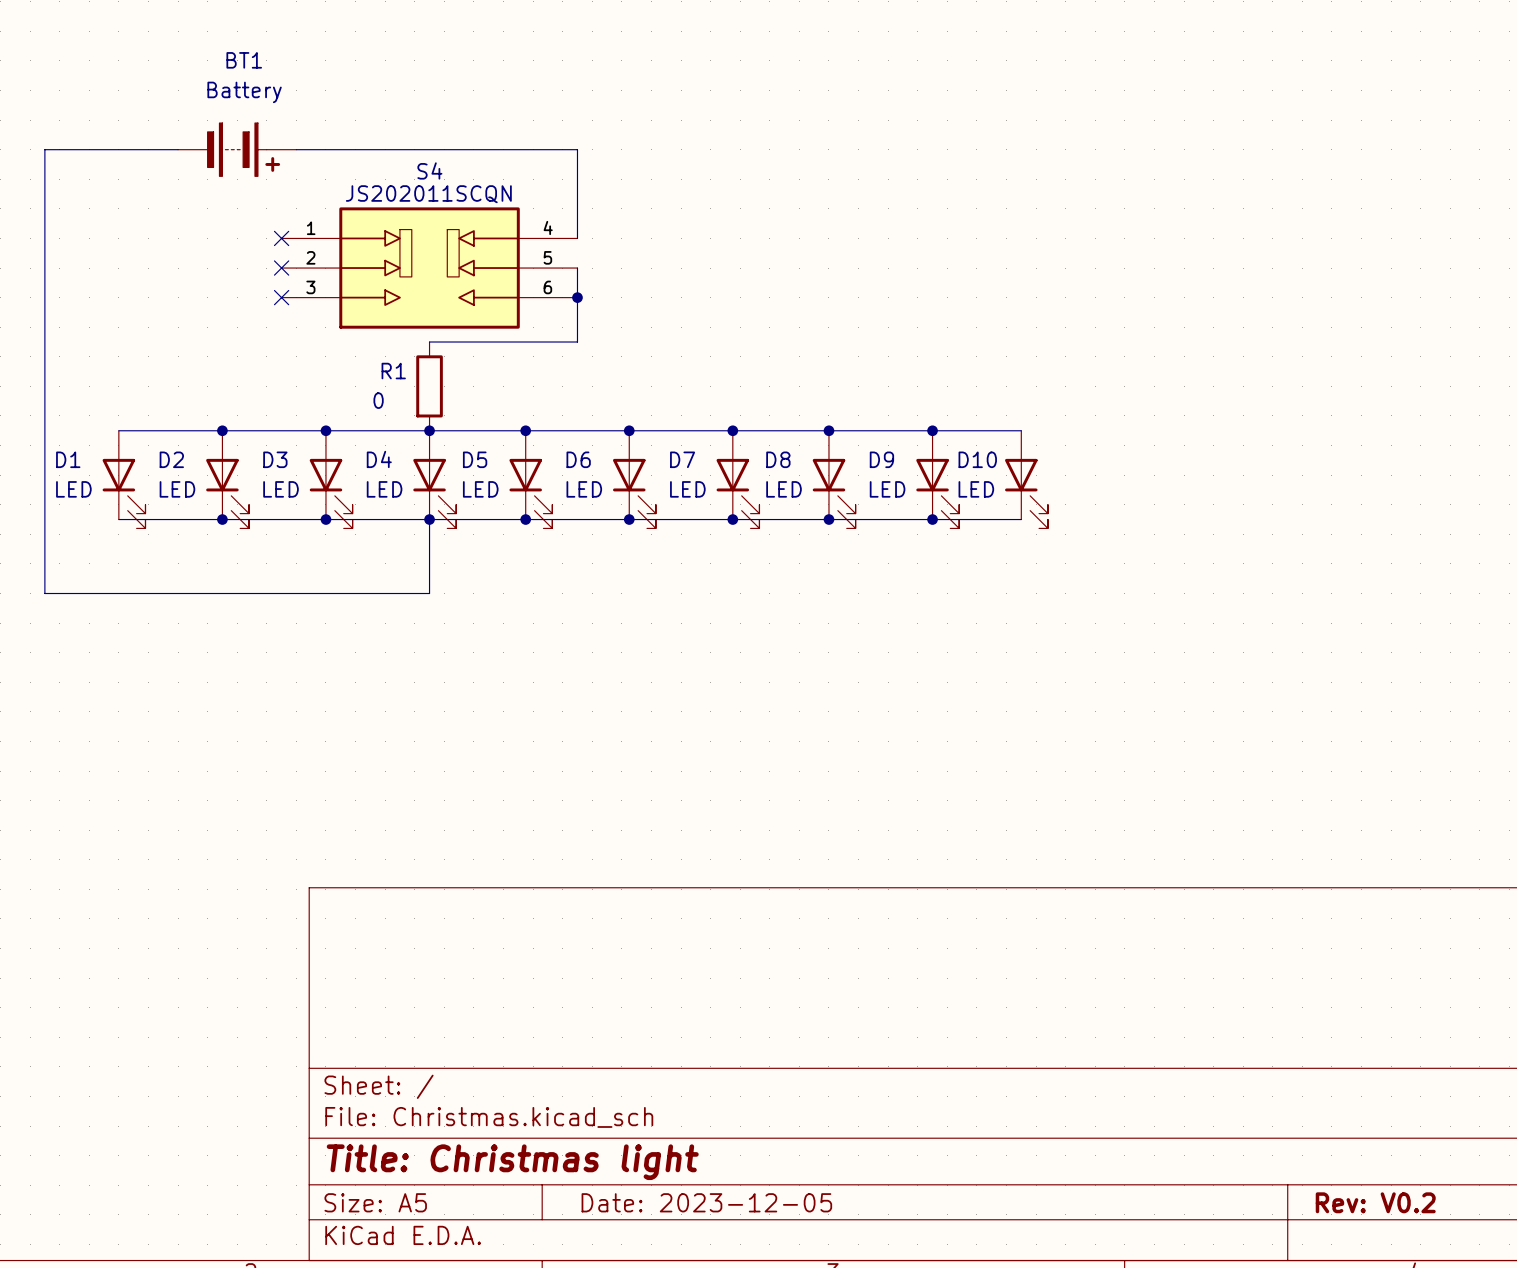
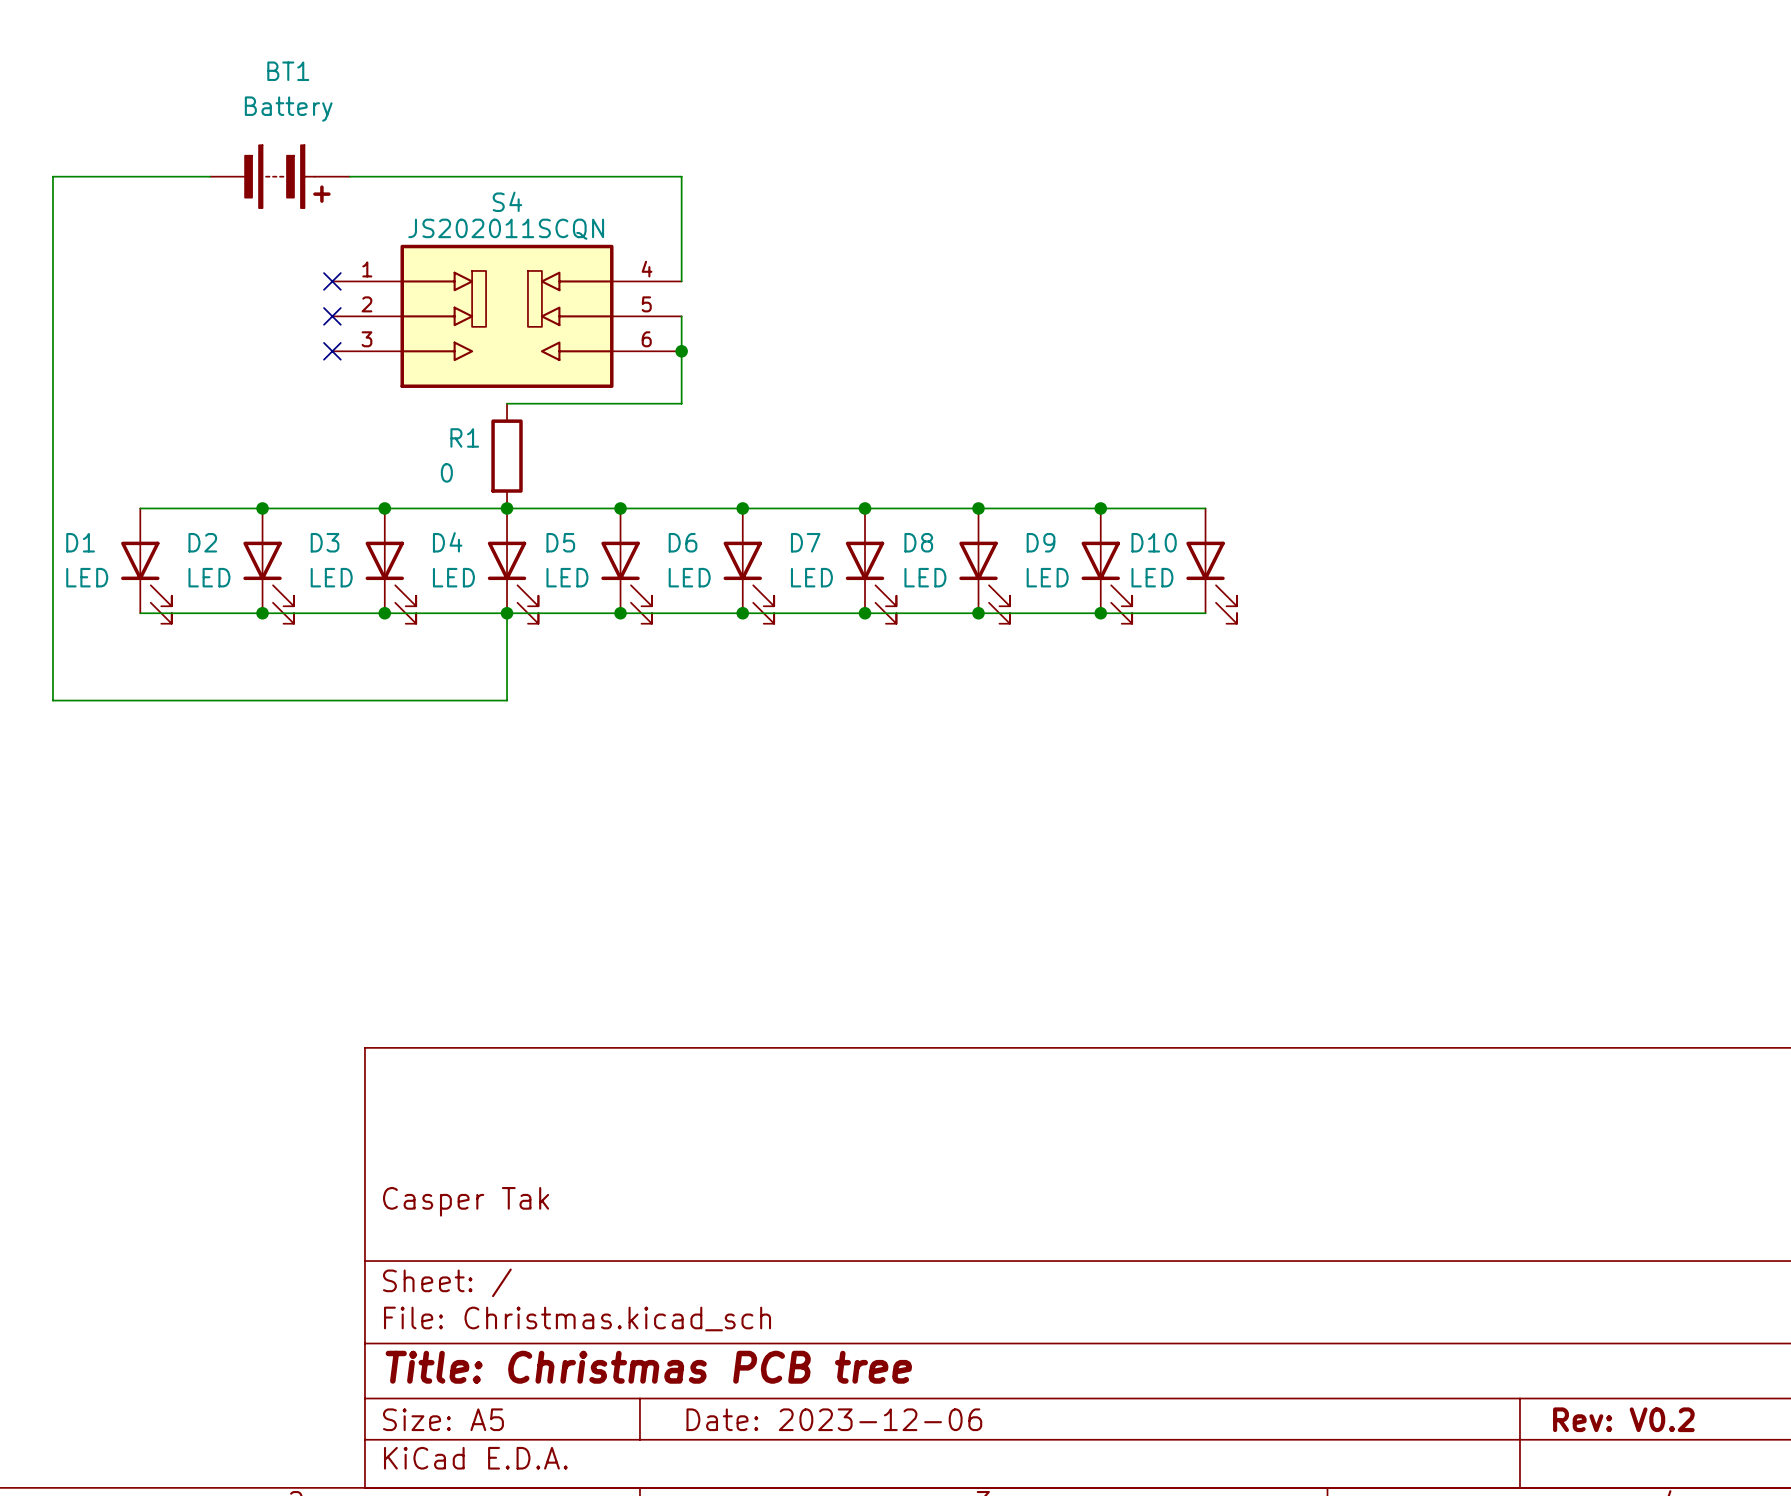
title block: none -> Casper Tak (466, 1201)
title block: Title: Christmas light (512, 1162) -> Title: Christmas PCB tree (648, 1367)
title block: Date: 2023-12-05 (706, 1202) -> Date: 2023-12-06 (834, 1419)

